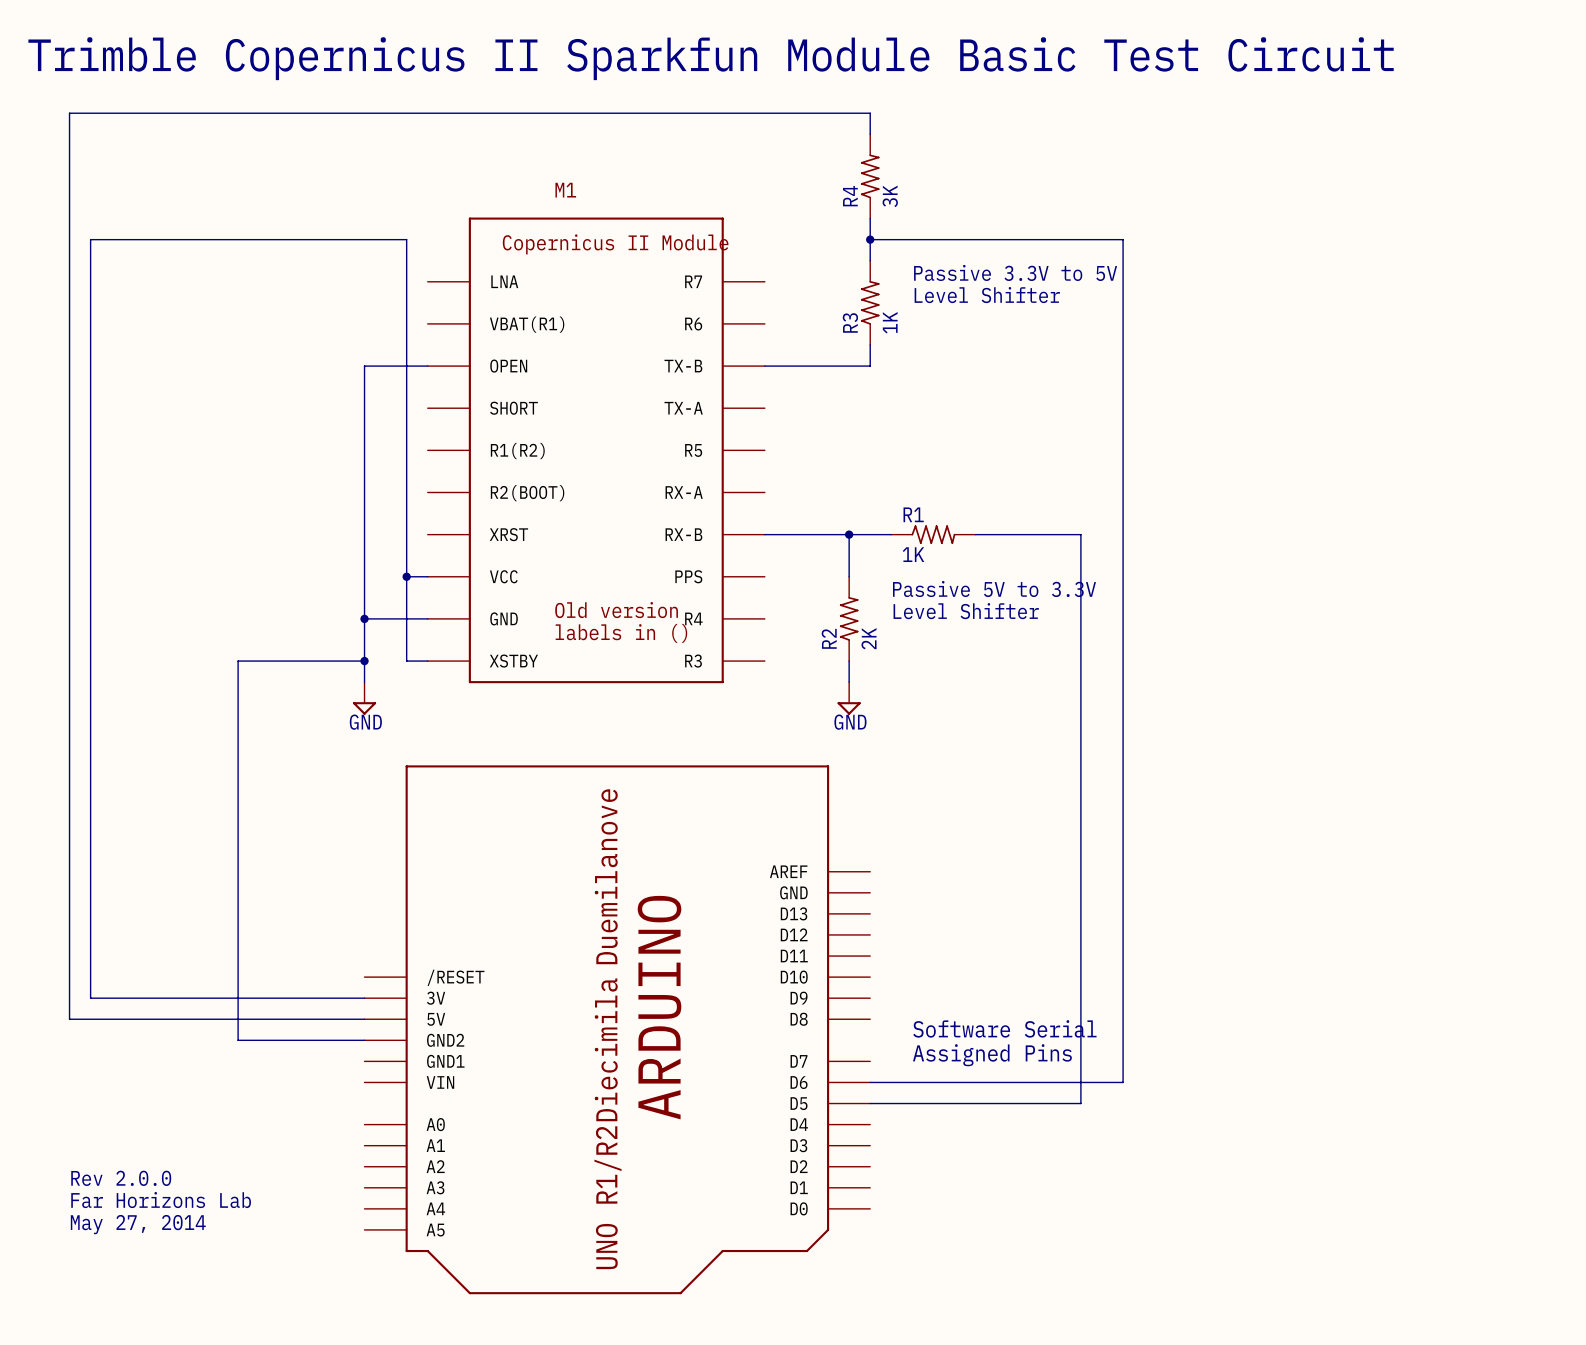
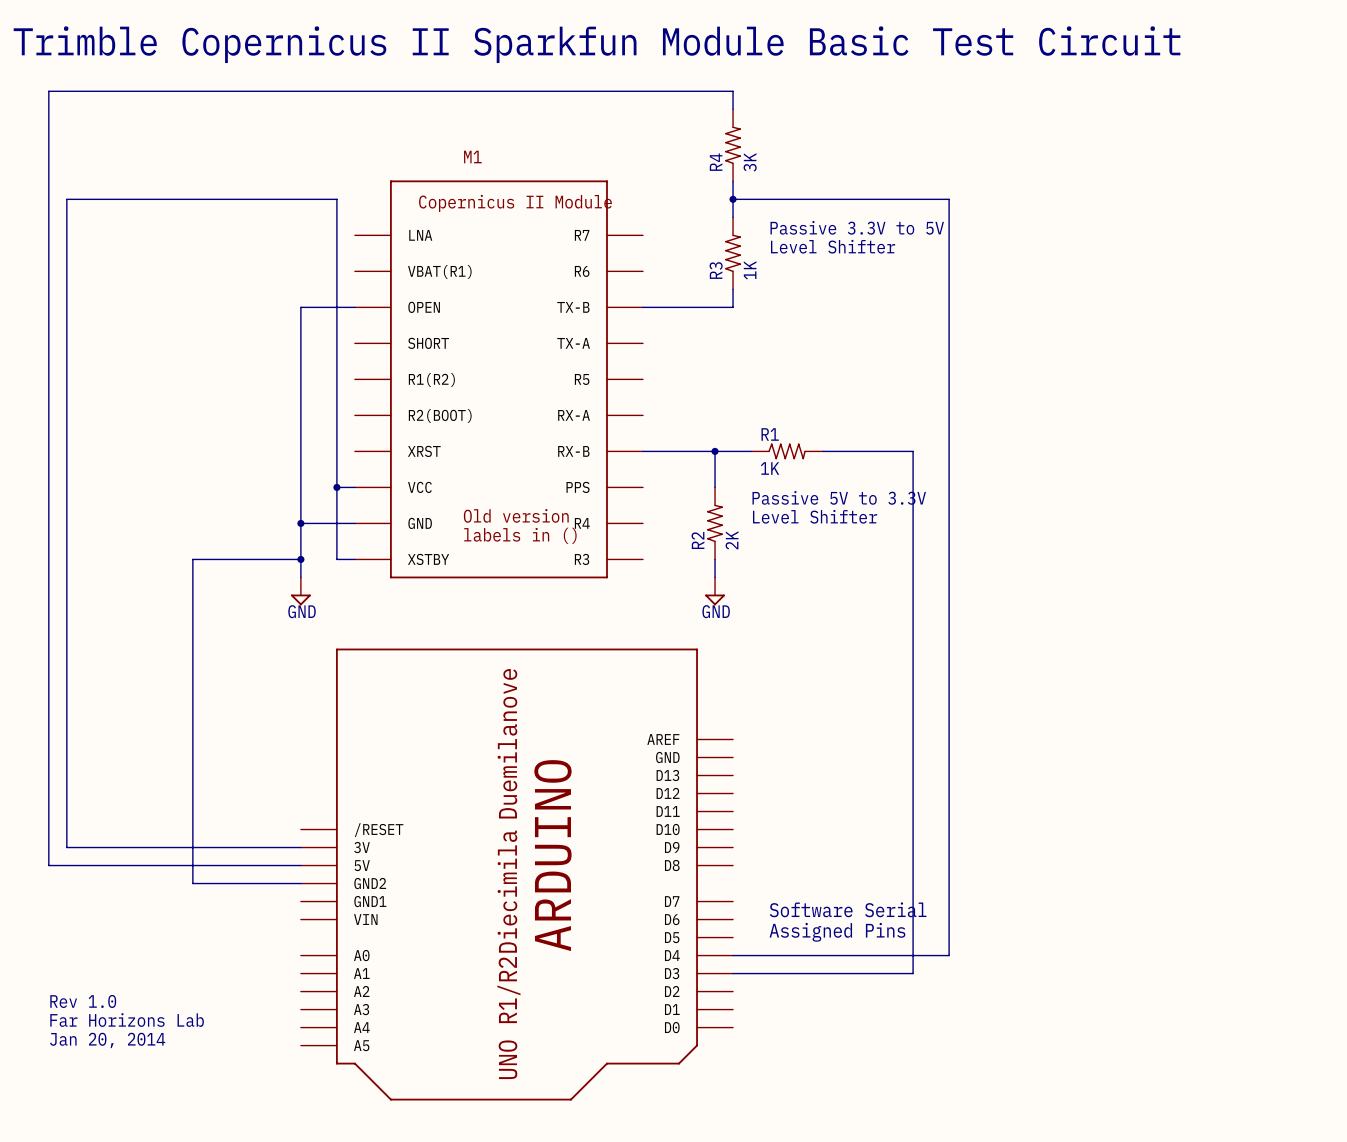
text position: Software Serial (1004, 1028) -> Software Serial (848, 909)
text position: Assigned Pins (992, 1055) -> Assigned Pins (837, 932)
wire: (870, 1082) (1123, 1082) -> (733, 955) (949, 955) (949, 919)
wire: (870, 1103) (1080, 1103) -> (733, 973) (913, 973) (913, 937)
text: Rev 2.0.0 (121, 1178) -> Rev 1.0 (83, 1001)
text: May 27, 2014 (138, 1224) -> Jan 20, 2014 (107, 1040)

